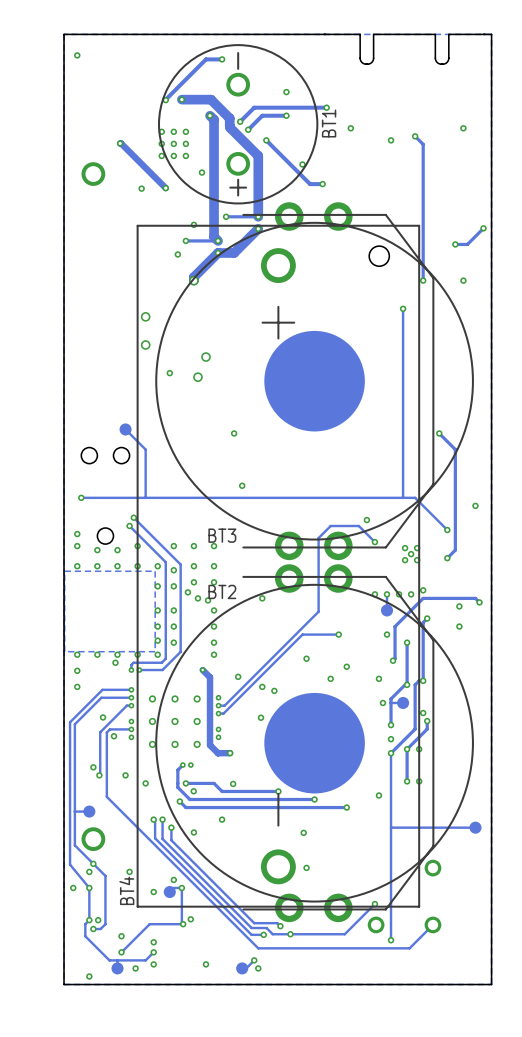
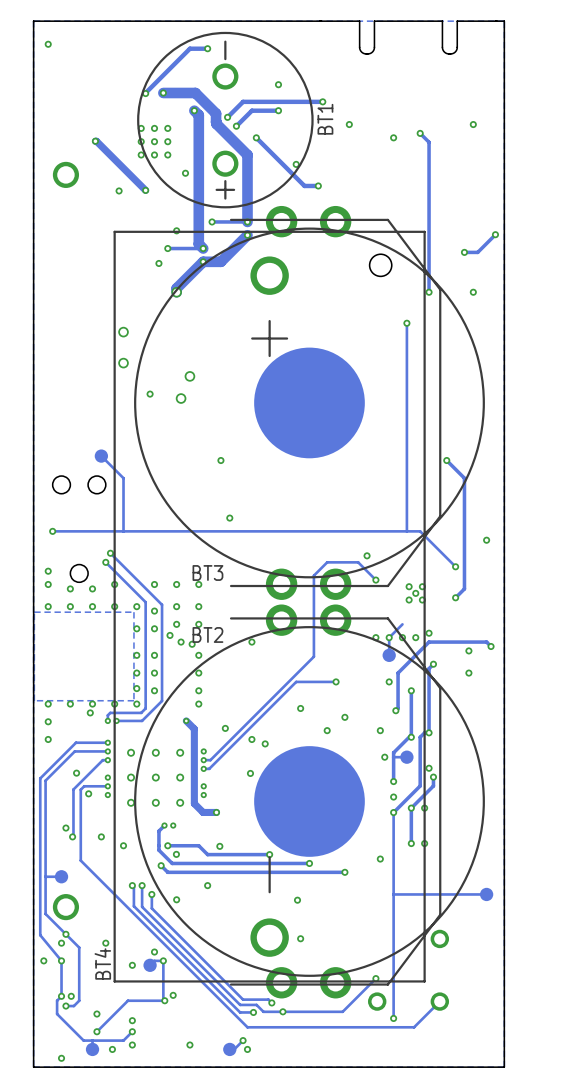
track: none -> (402, 624) (389, 637)

